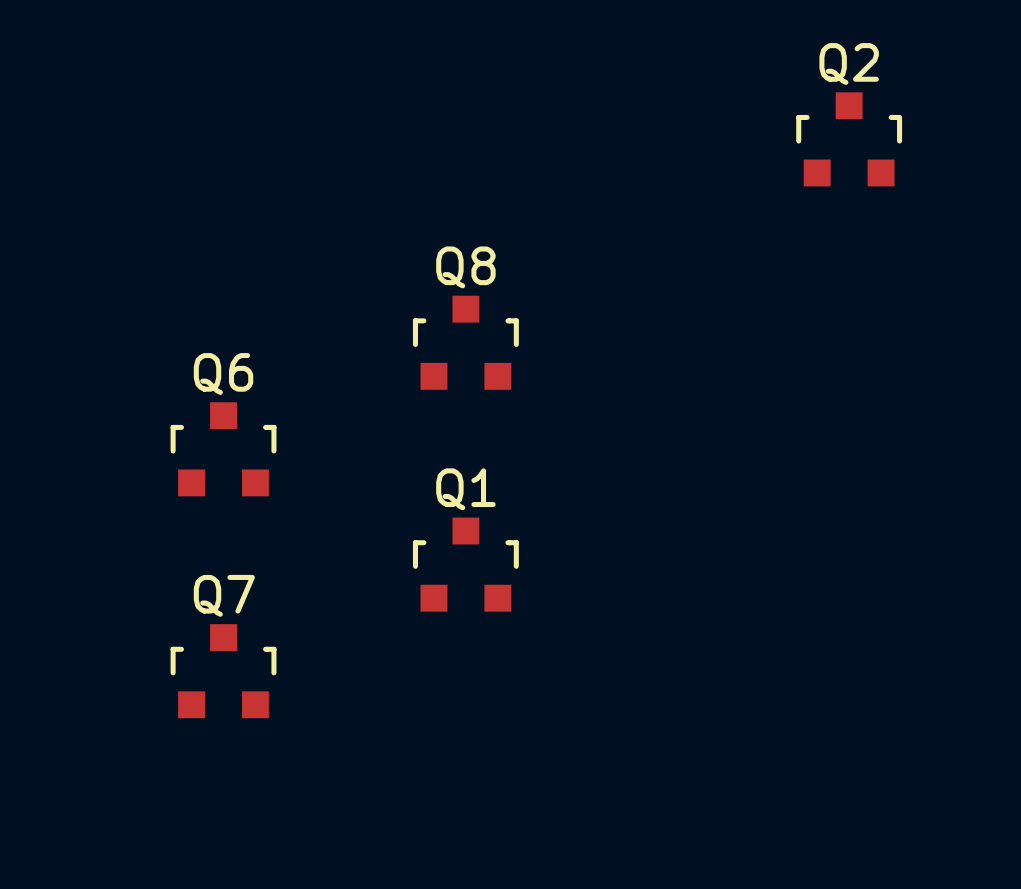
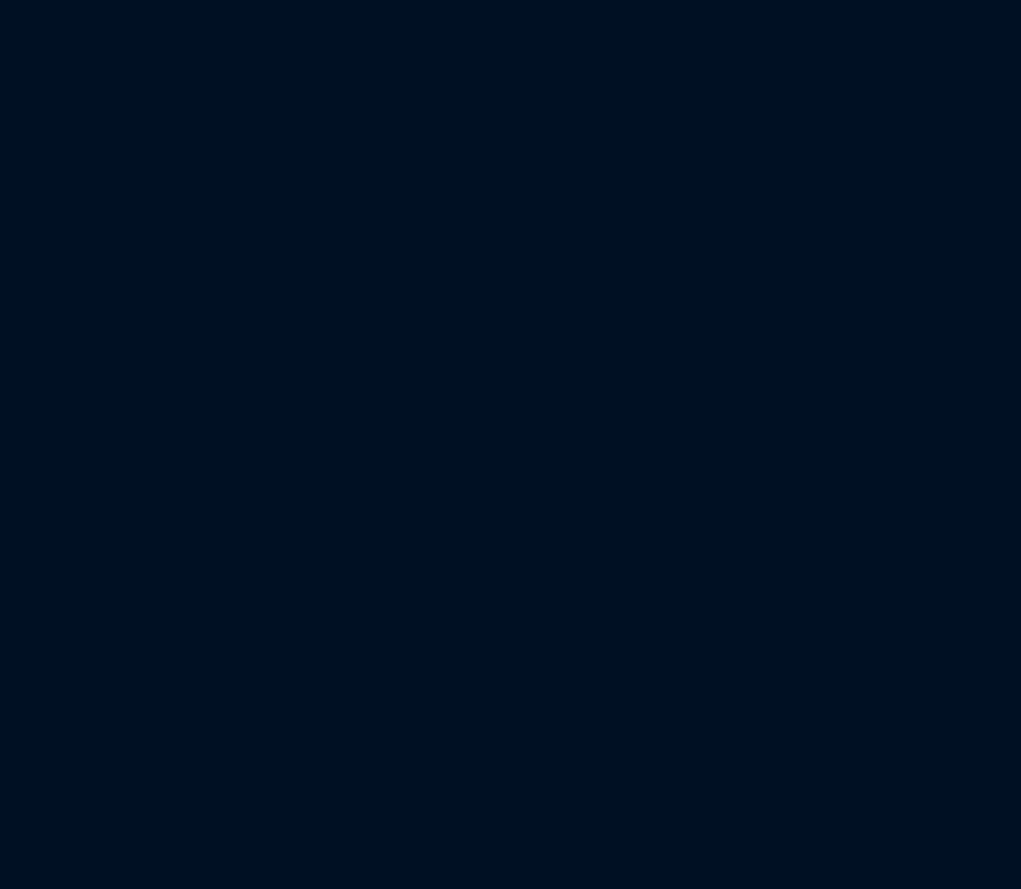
Q2: (849, 139) -> none
Q8: (465, 342) -> none
Q6: (223, 449) -> none
Q1: (465, 564) -> none
Q7: (223, 671) -> none

